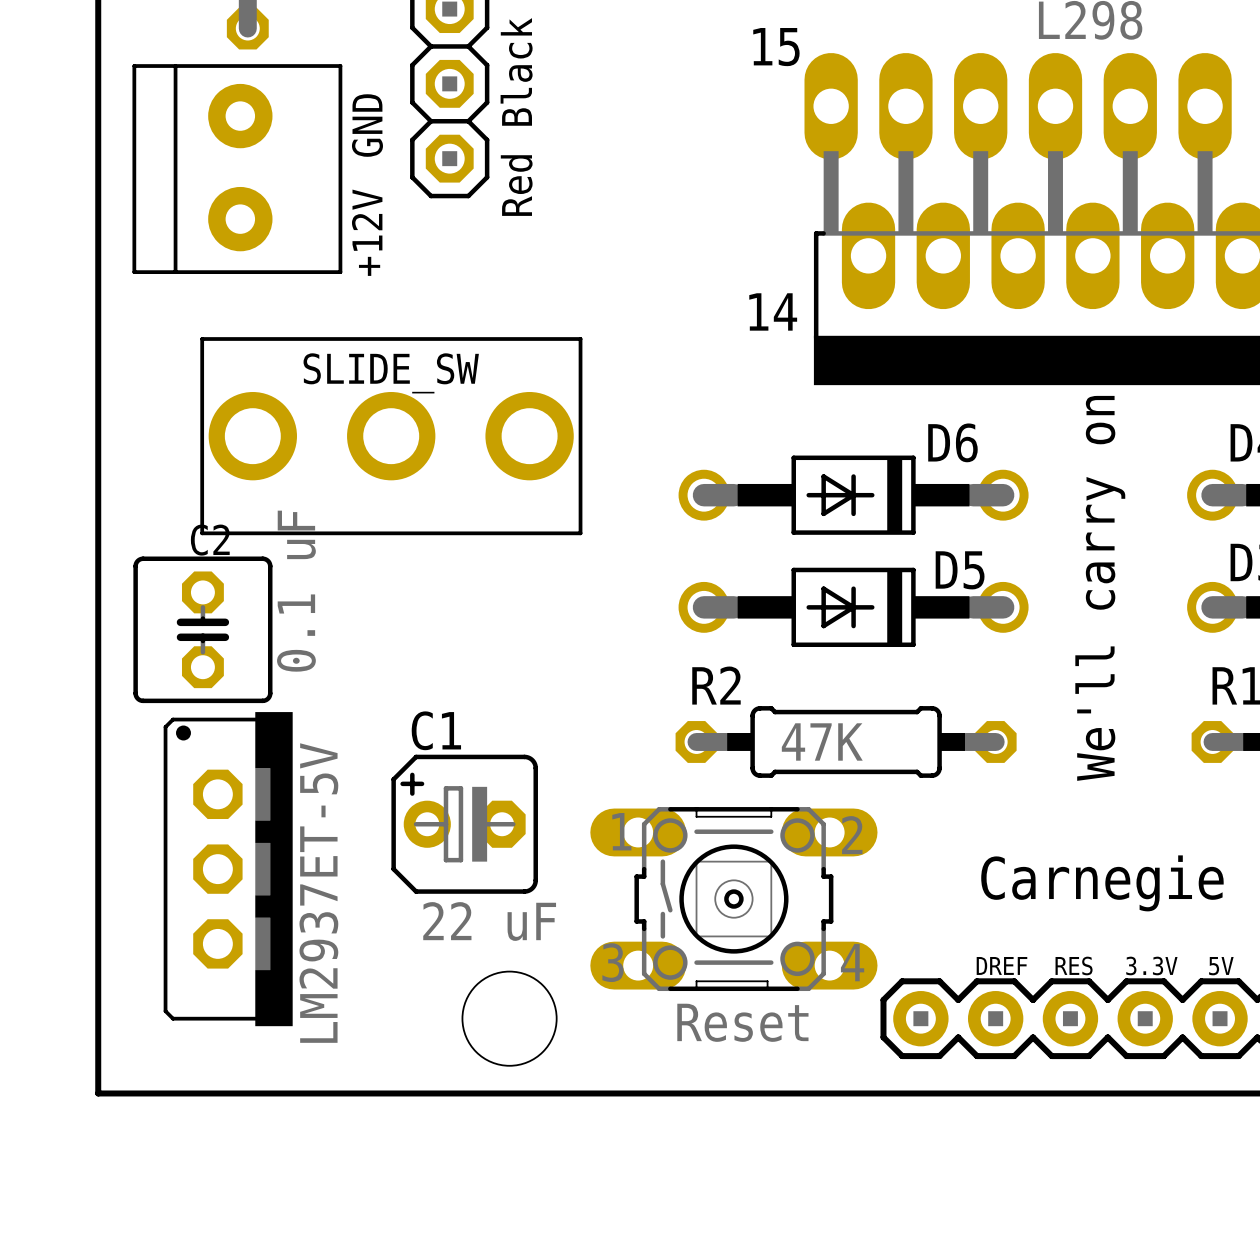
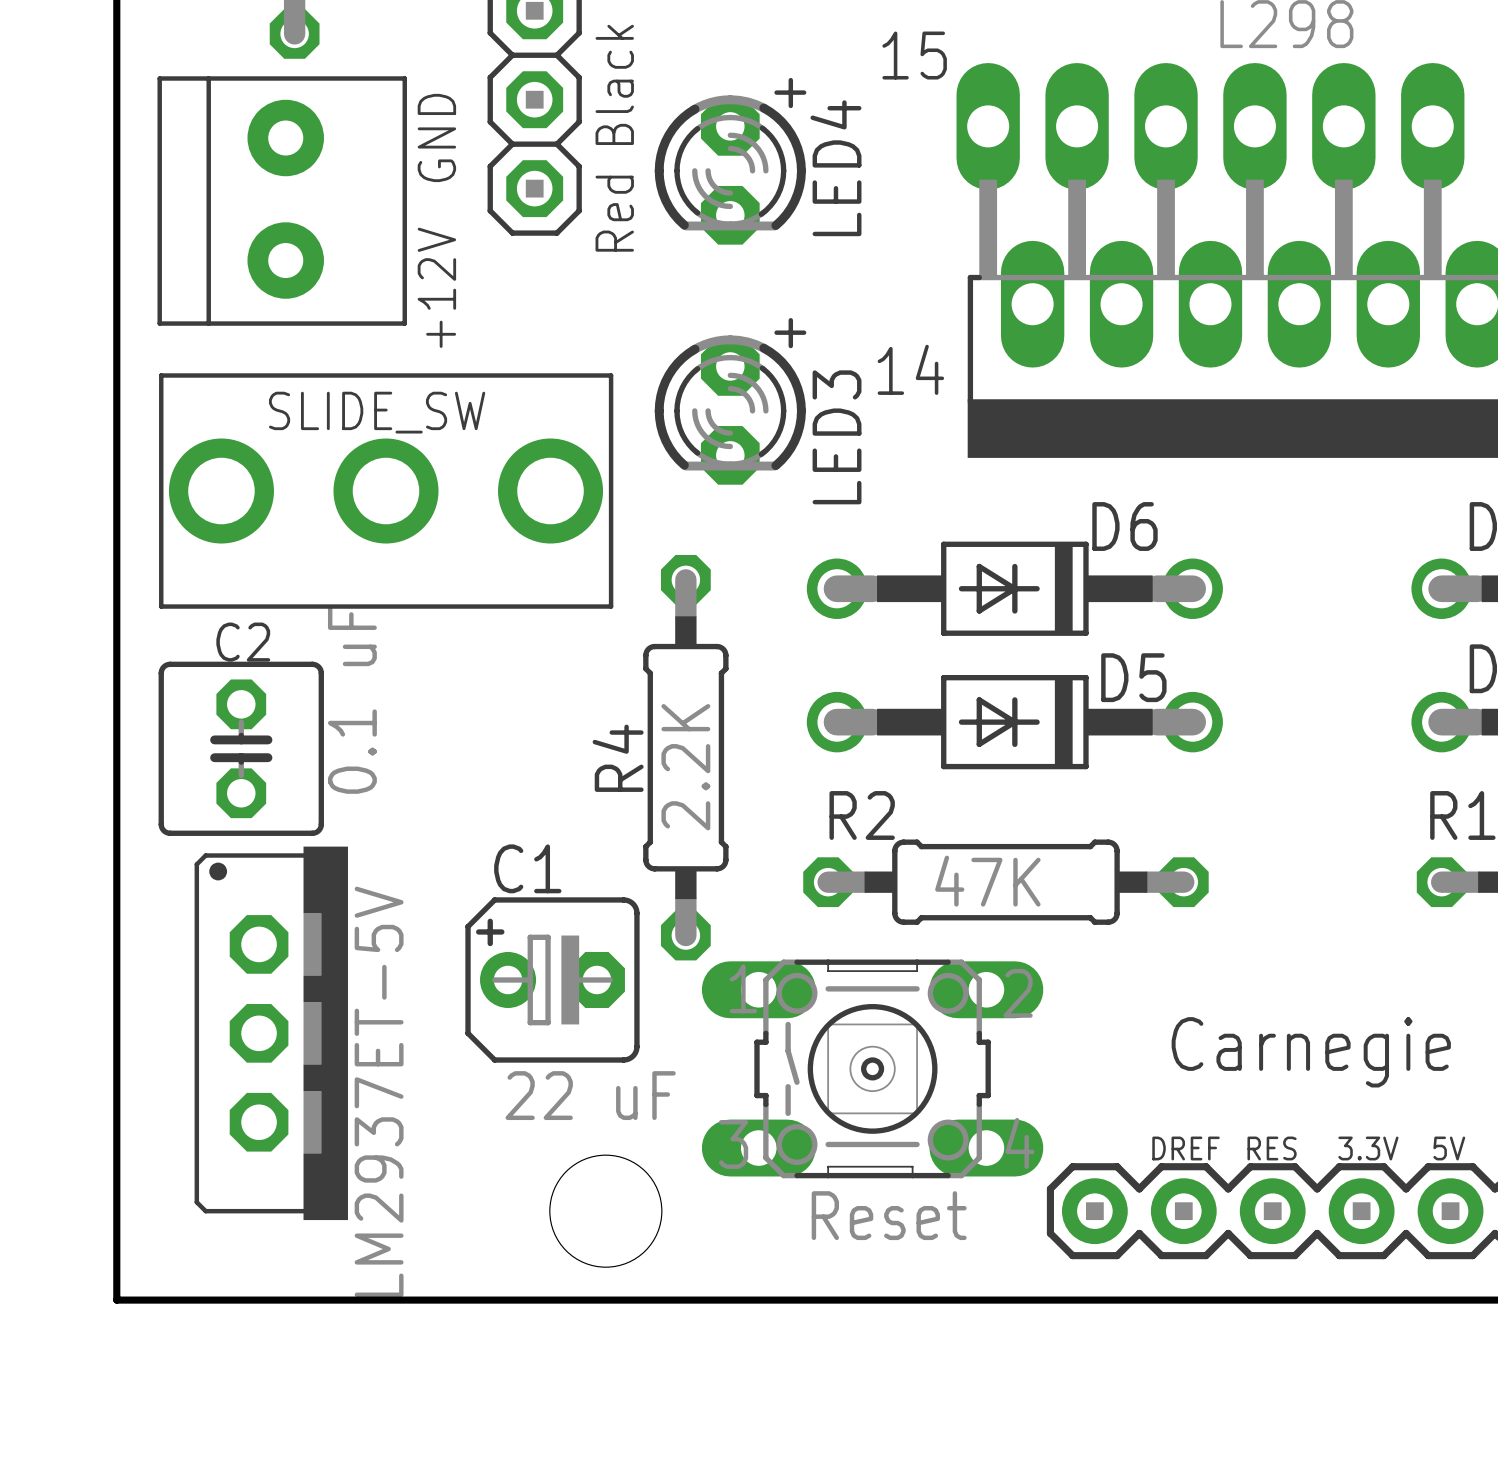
LED4: none -> (730, 161)
LED3: none -> (730, 401)
SLIDE_SW position: (391, 436) -> (386, 491)
text: We'll carry on (1100, 588) -> none
R4: none -> 2.2K (685, 757)

